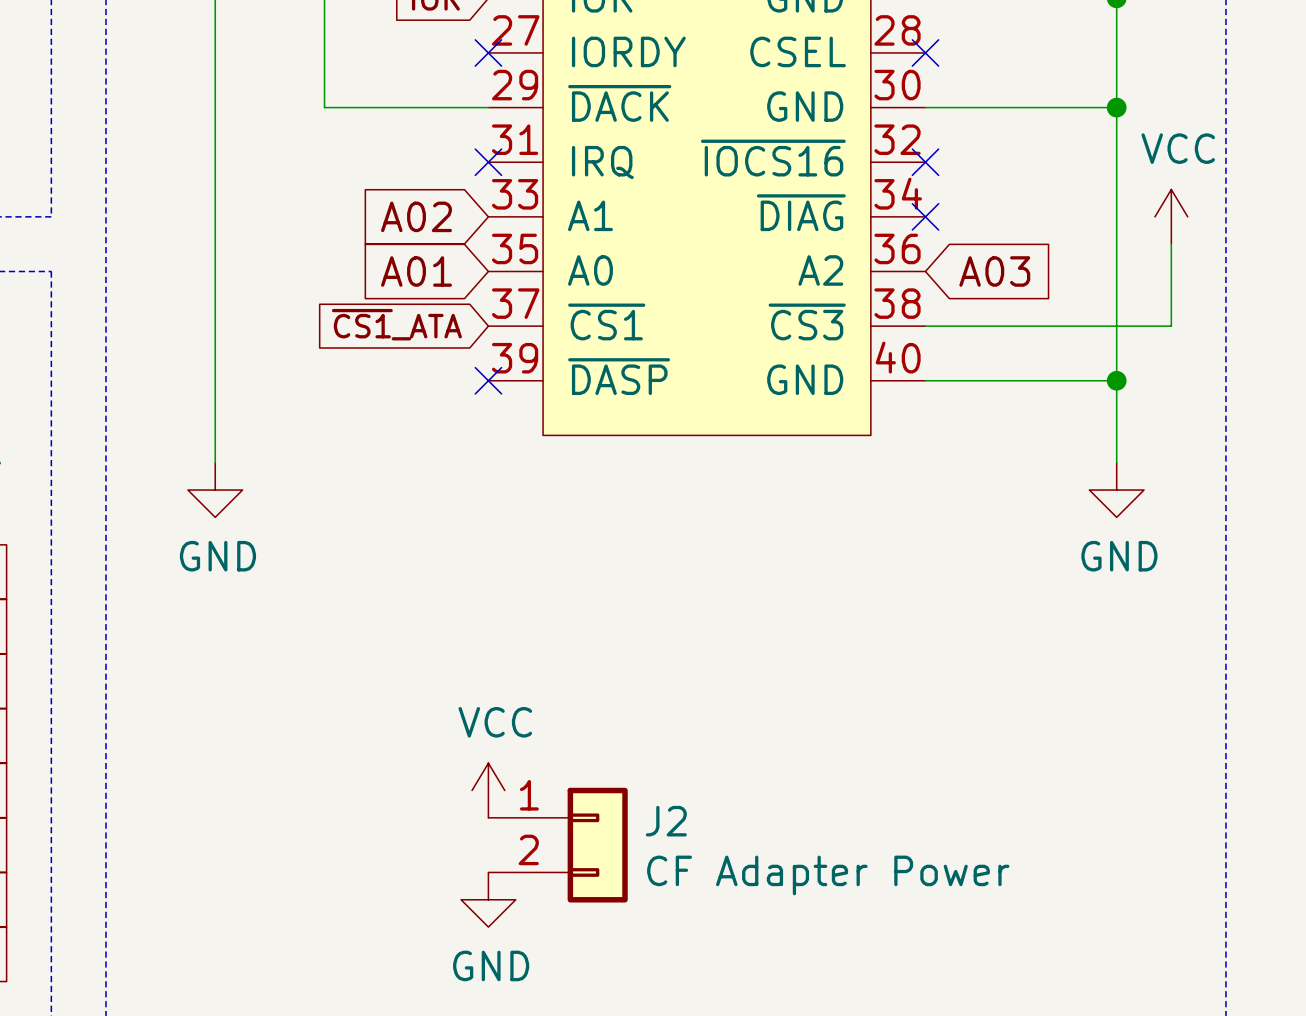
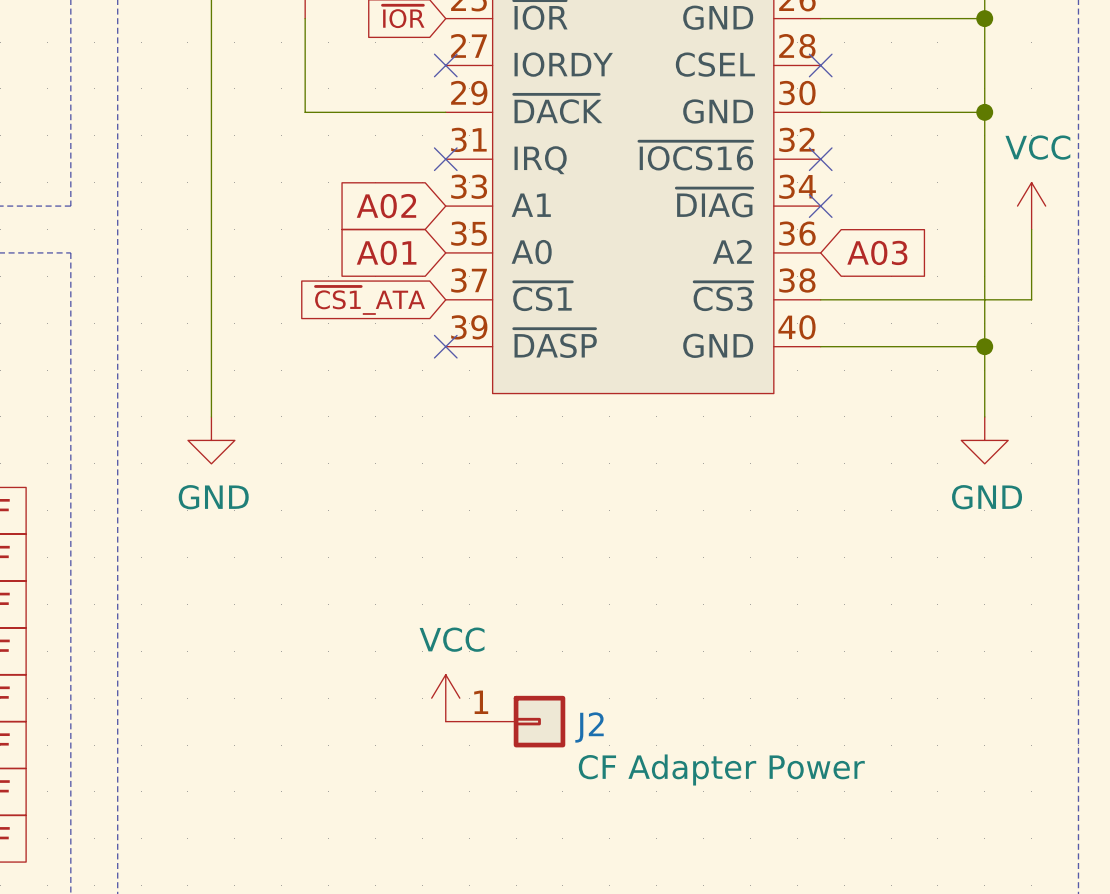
J2 symbol: [488, 787, 628, 903] -> [445, 695, 566, 748]
power symbol: GND (488, 899) -> none

